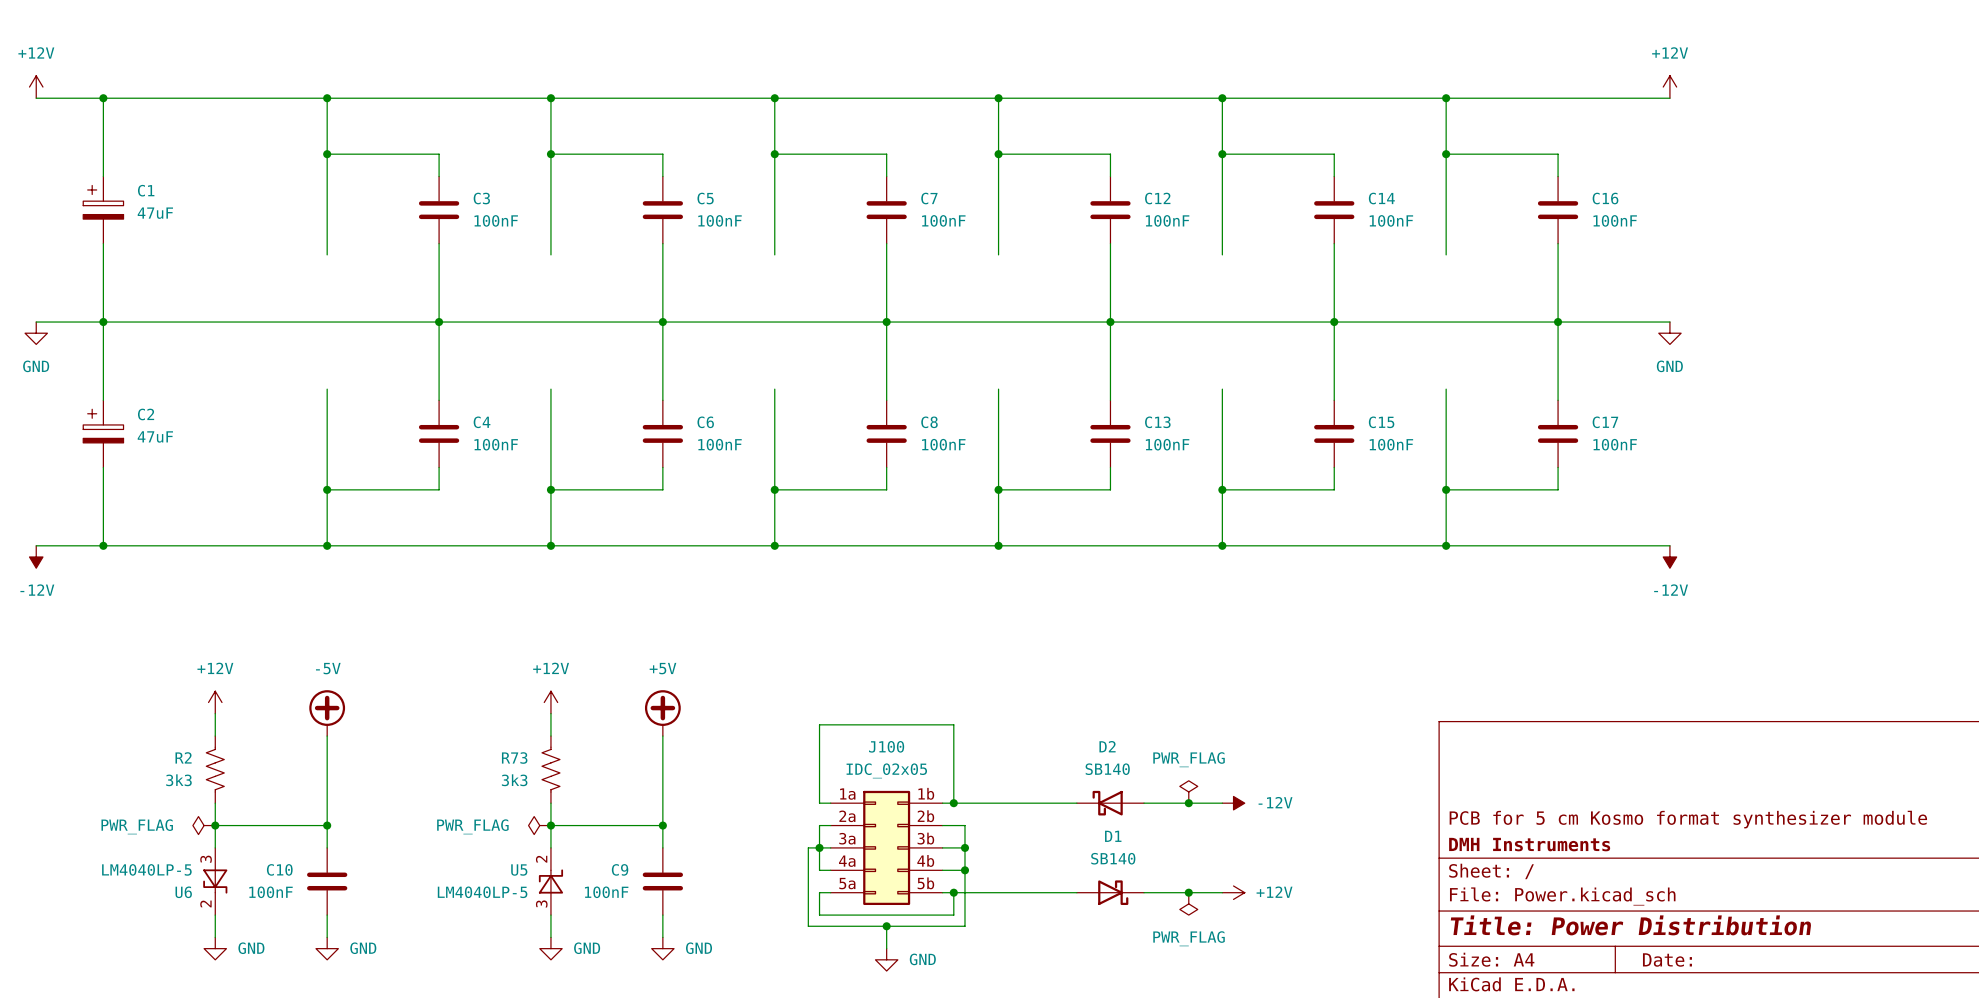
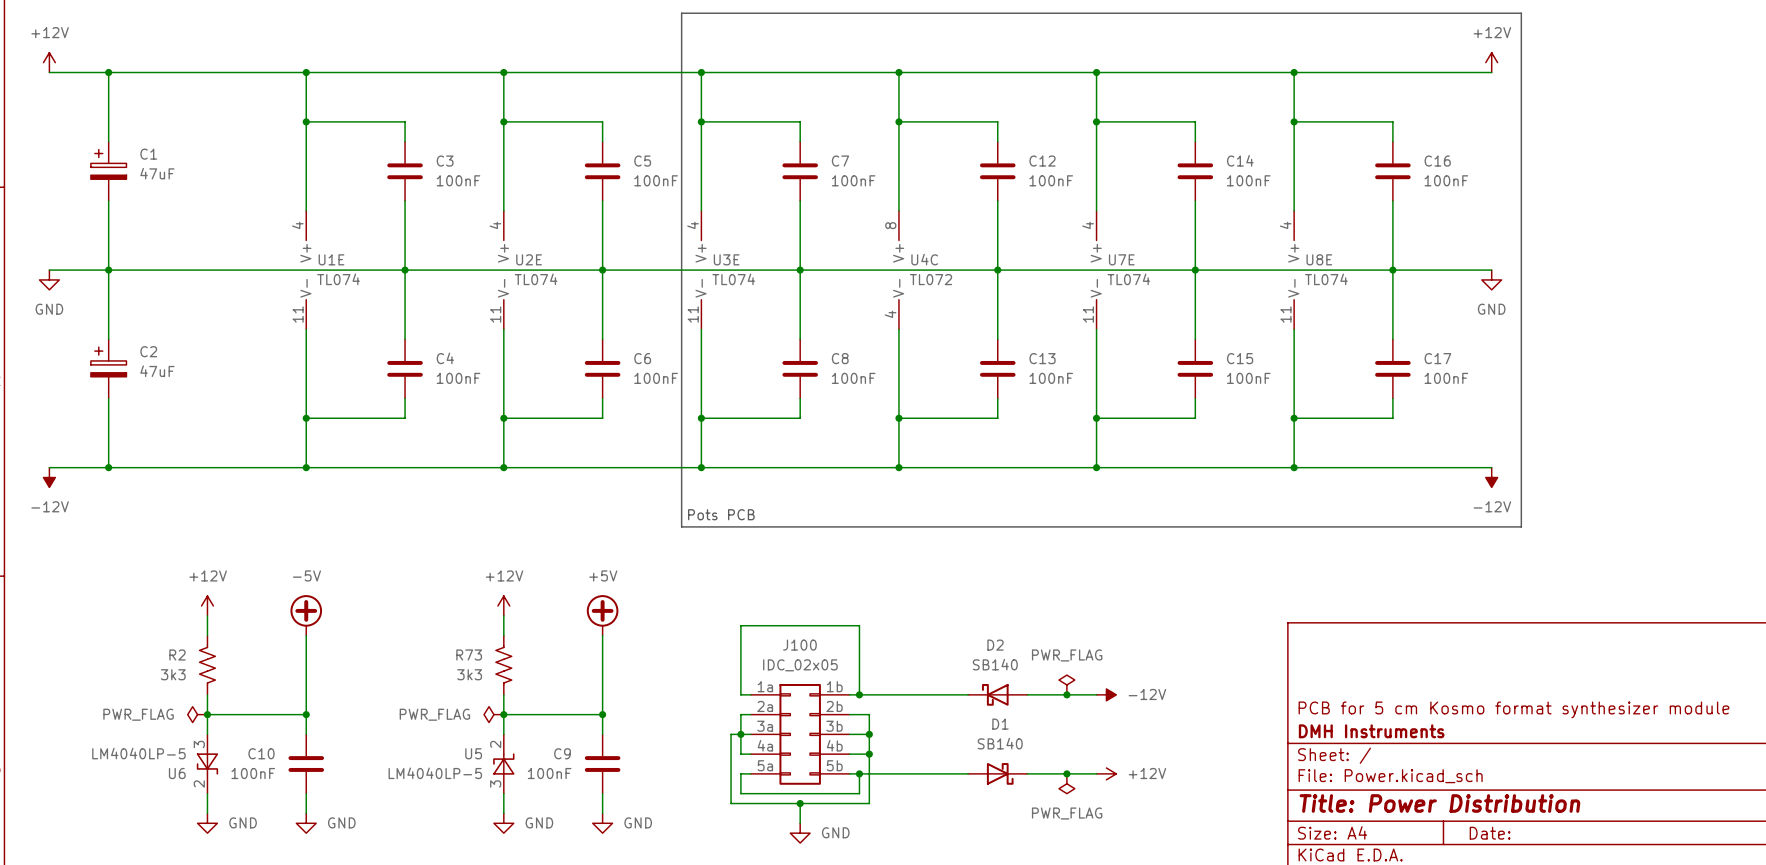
line: none -> (681, 13) (1521, 13) (1521, 526) (681, 526) (681, 13)
U1E: none -> TL074 (306, 270)
U2E: none -> TL074 (503, 270)
U3E: none -> TL074 (701, 270)
U4C: none -> TL072 (898, 270)
U7E: none -> TL074 (1096, 270)
U8E: none -> TL074 (1294, 270)
text: none -> Pots PCB (721, 514)

